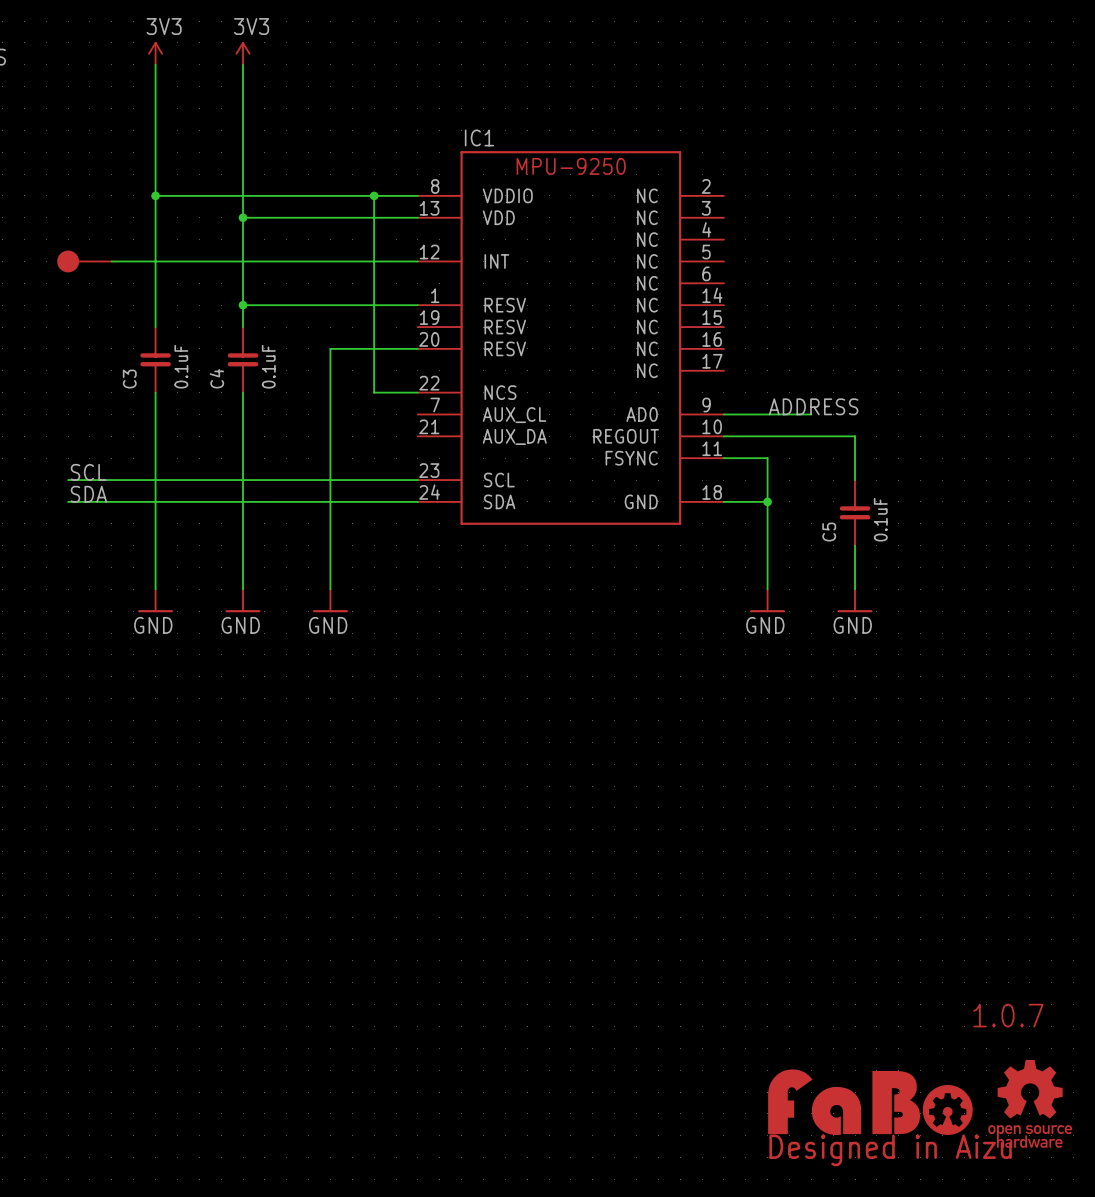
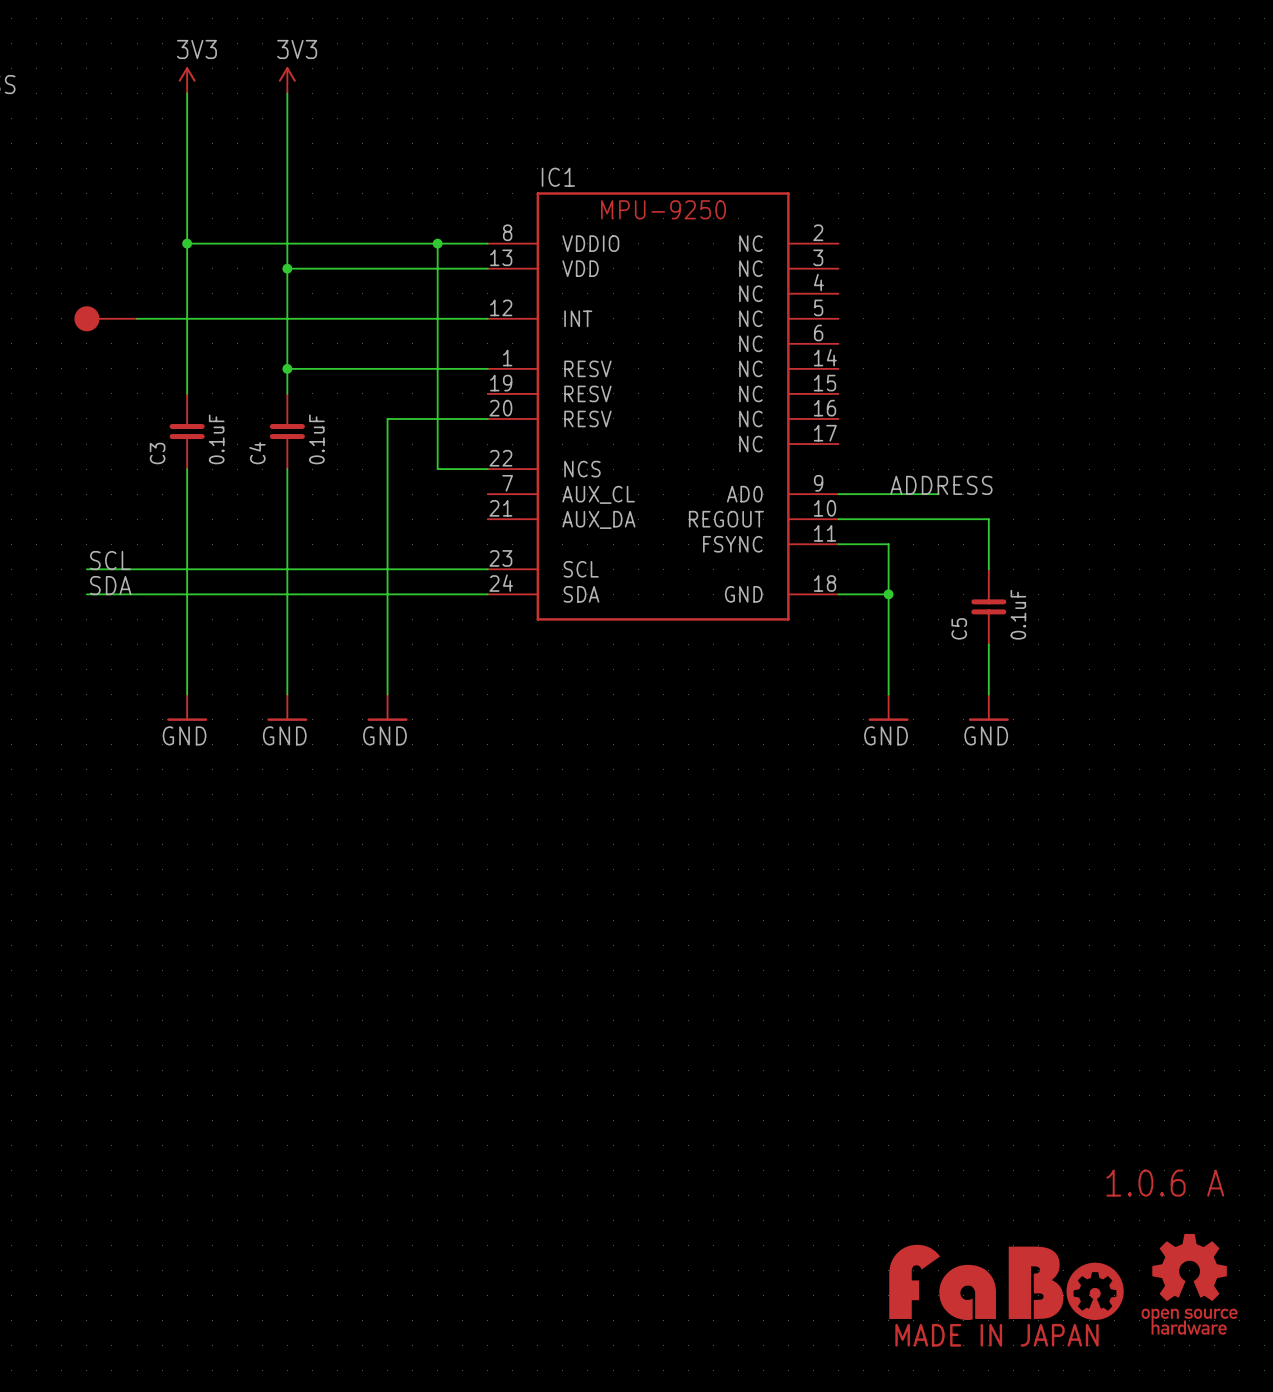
text: 1.0.7 (1008, 1015) -> 1.0.6 A (1165, 1183)
part text: none -> MADE IN JAPAN (997, 1335)
part text: Designed in Aizu (890, 1150) -> none

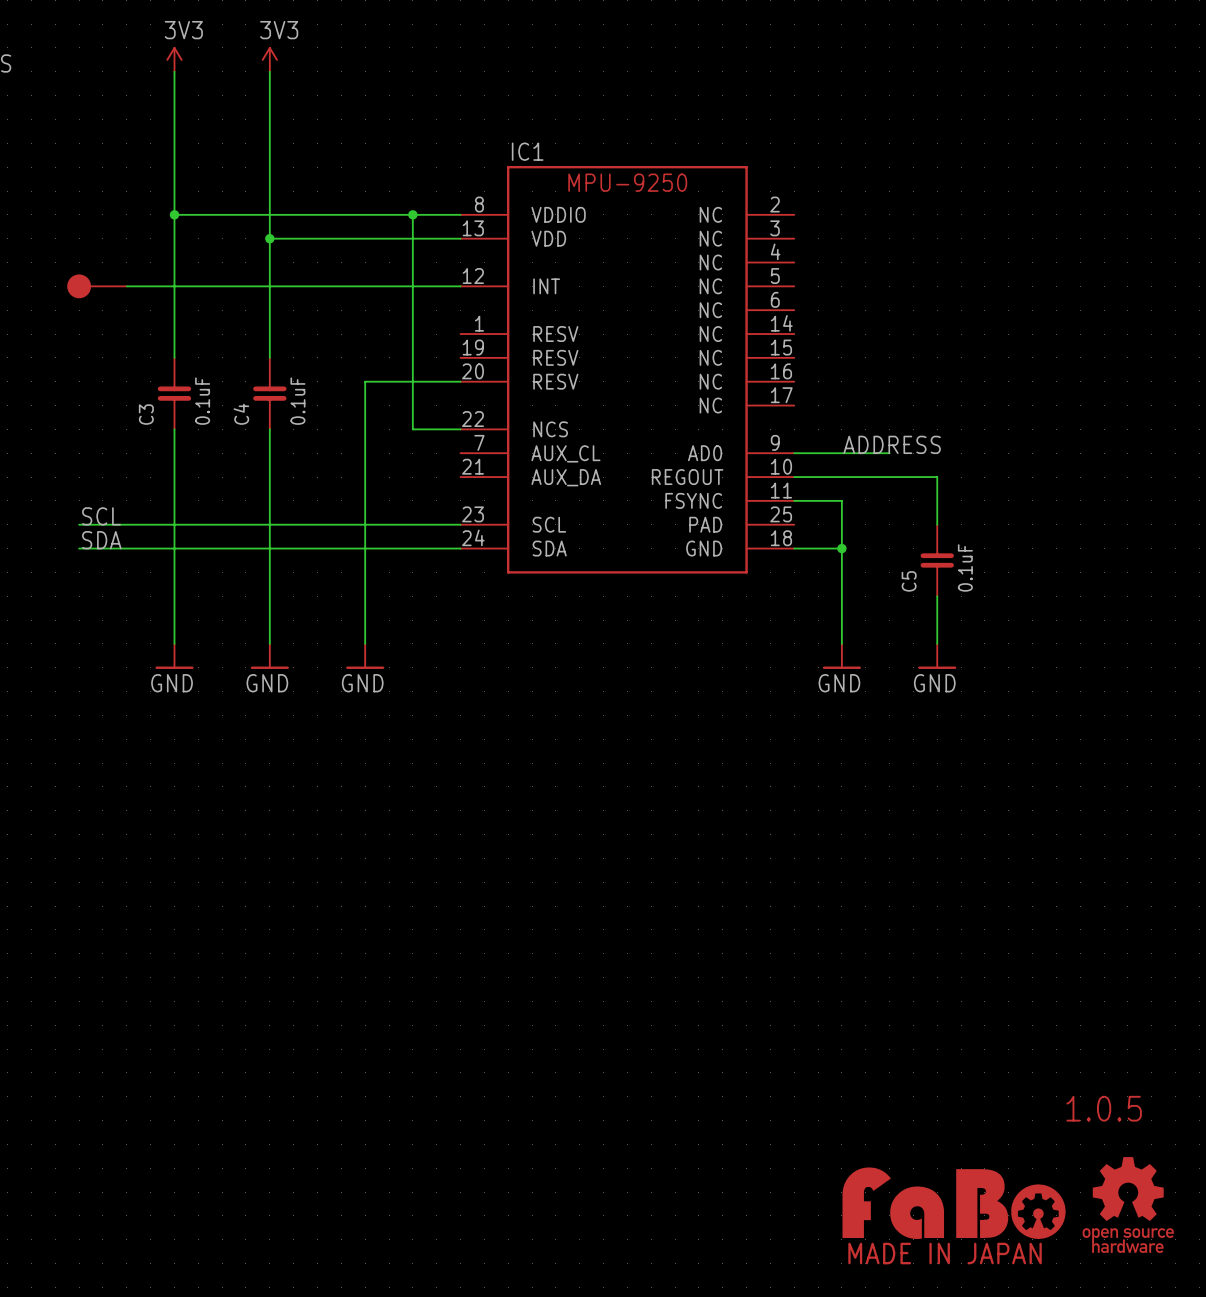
IC1 symbol: [487, 192, 839, 621] -> [460, 165, 795, 574]
wire: (287, 368) (487, 368) -> none
junction: (287, 368) -> none
text: 1.0.6 A (1165, 1183) -> 1.0.5 (1104, 1108)

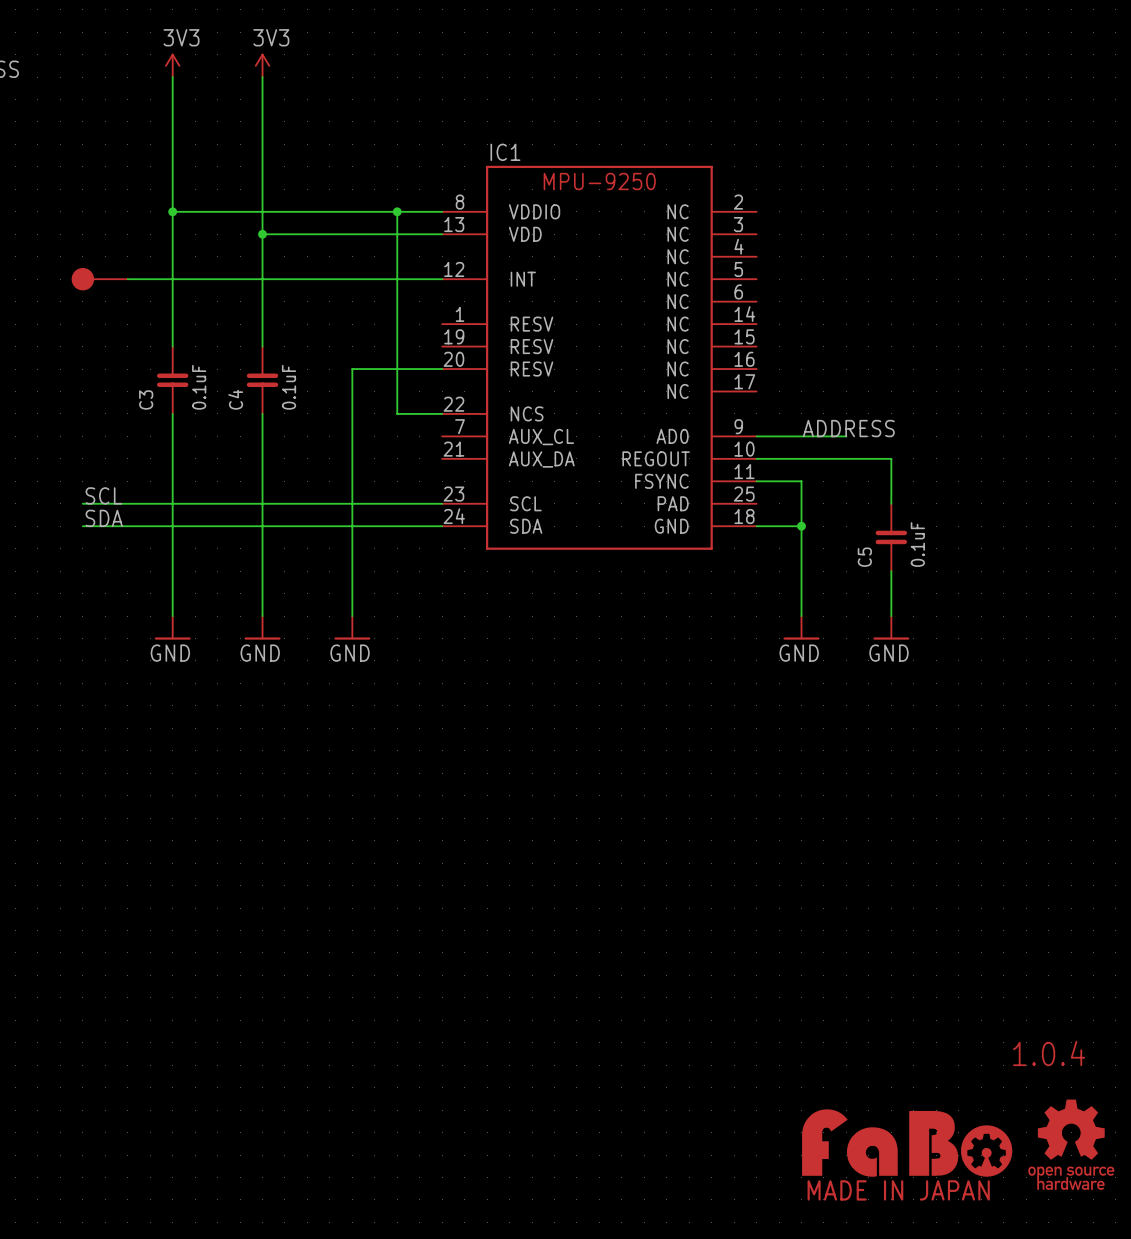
text: 1.0.5 (1104, 1108) -> 1.0.4 (1049, 1053)

